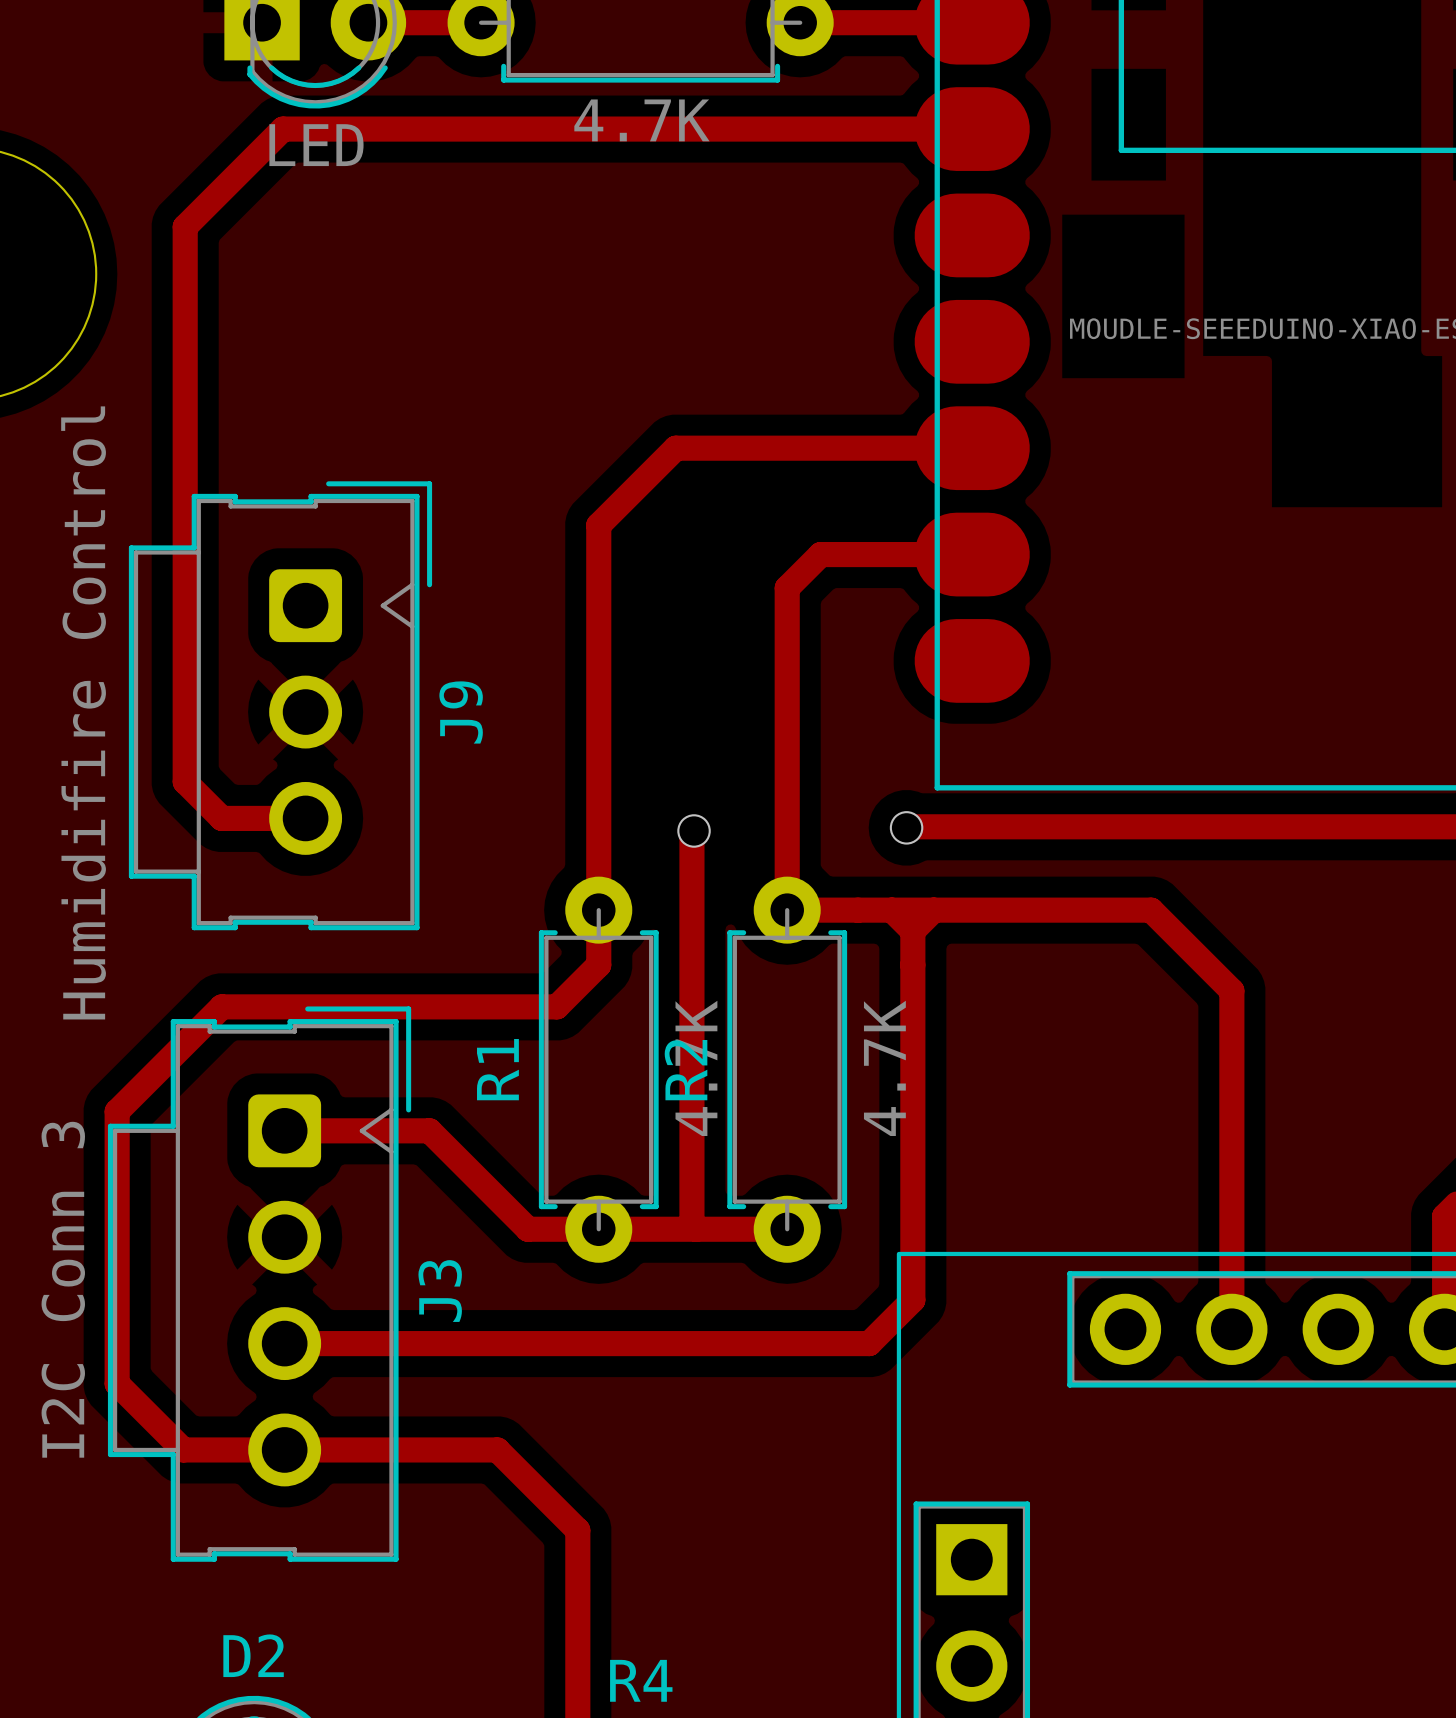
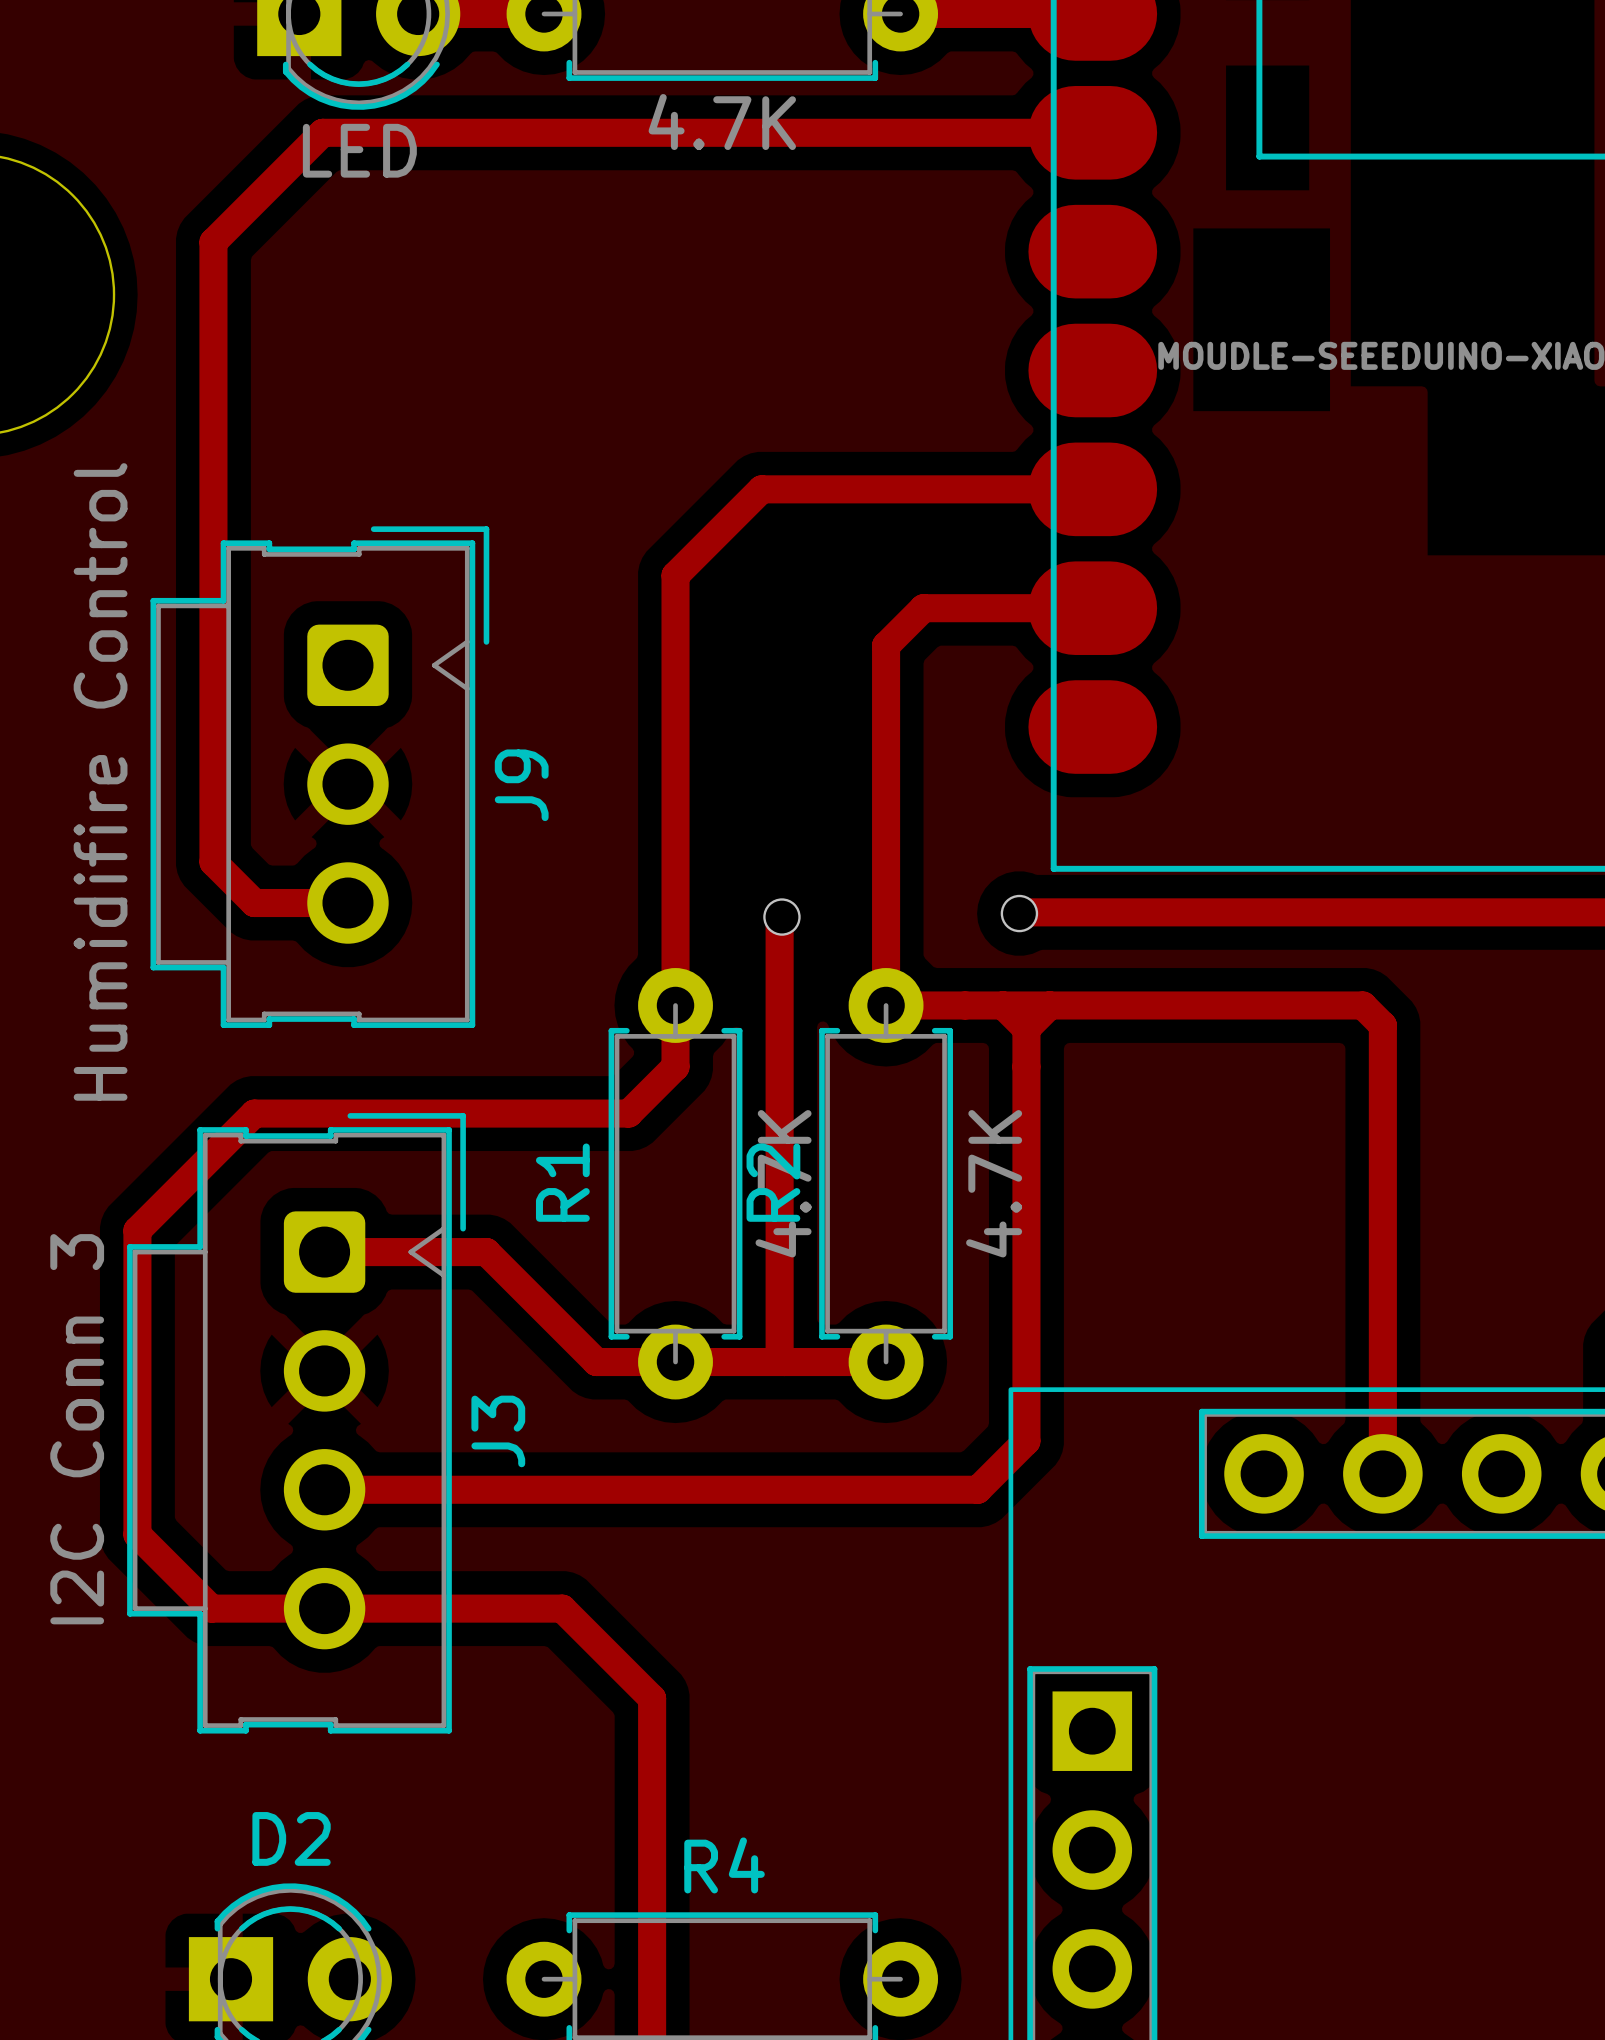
track: (1151, 910) (1231, 990) -> (1292, 1005) (1362, 1005) (1382, 1025) (1382, 1095)

